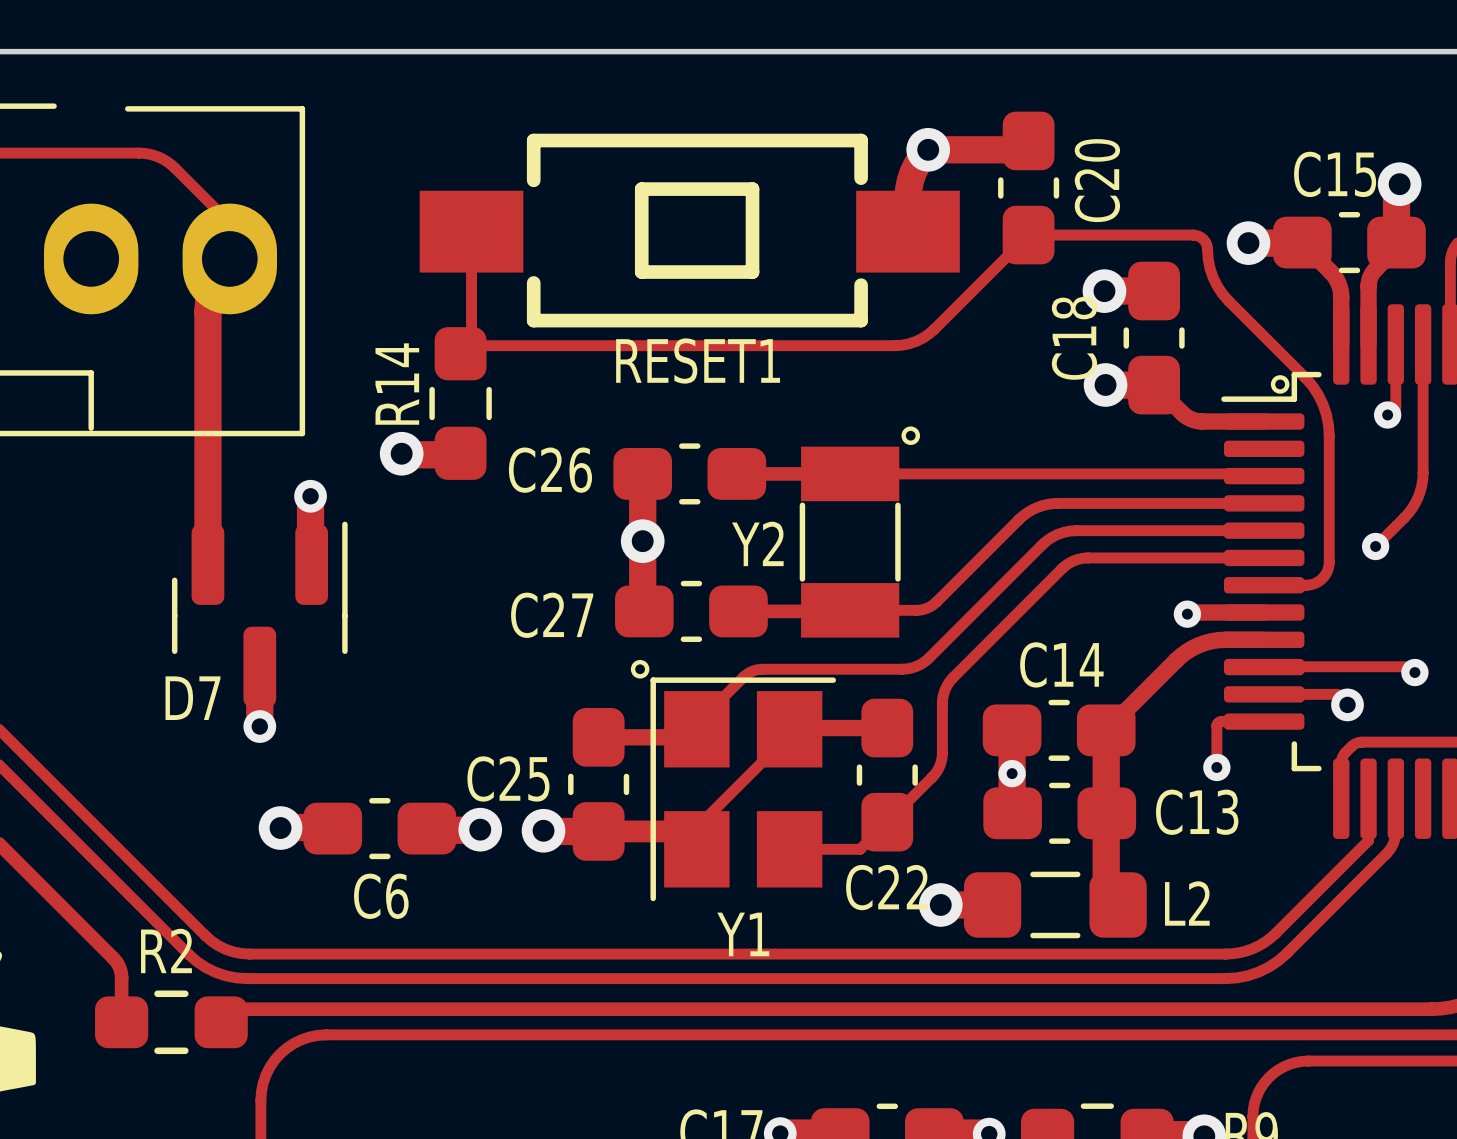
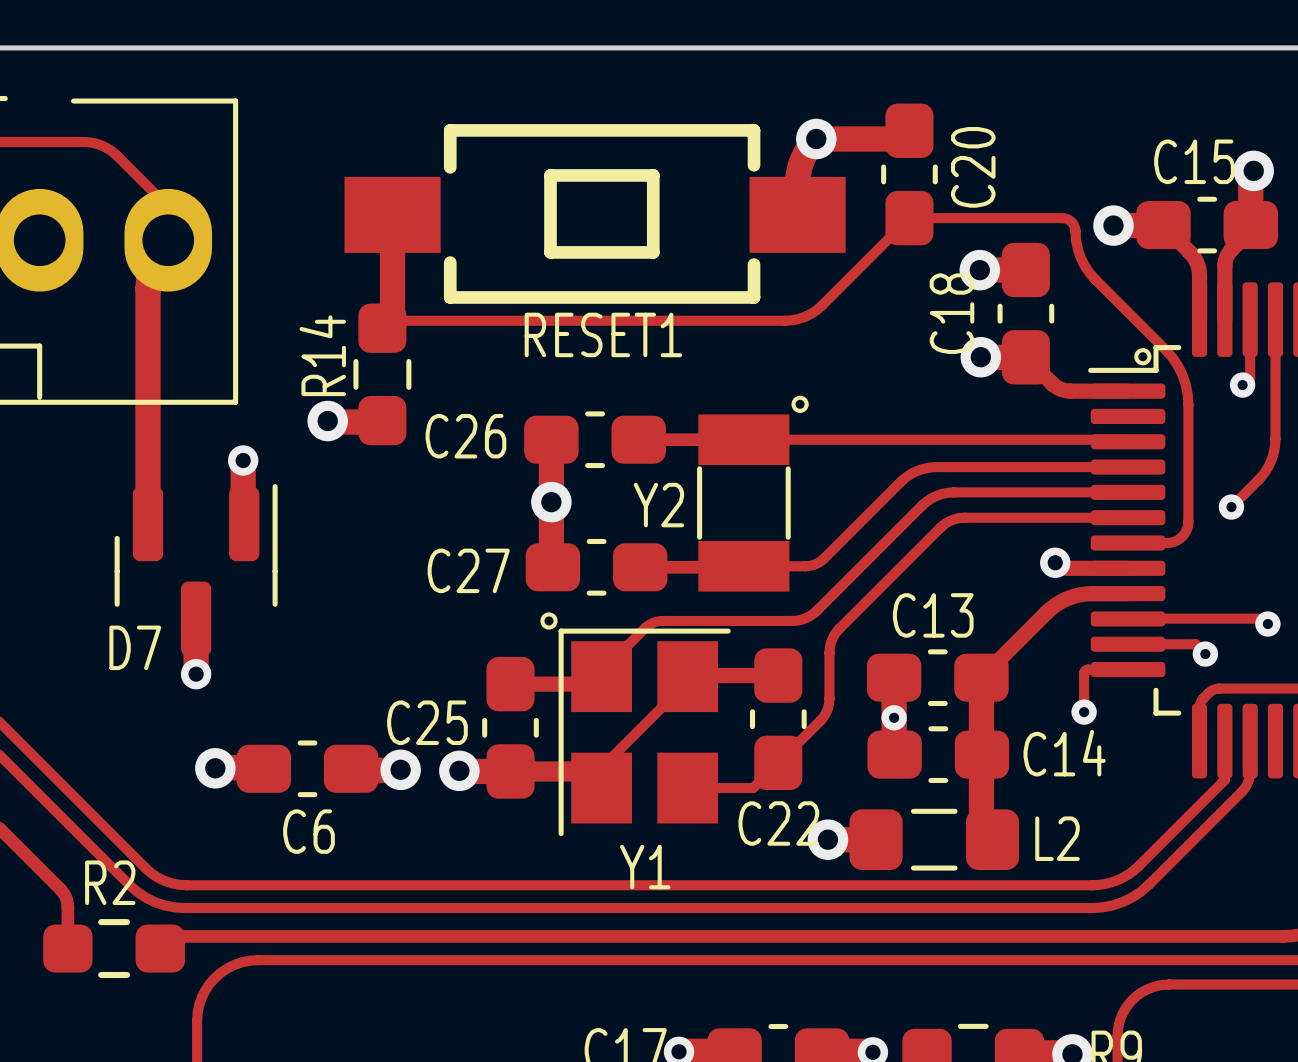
track width: thin (471, 231) (471, 342) -> thick (392, 214) (392, 318)
via position: (1187, 614) -> (1205, 654)
C14 name: C14 (1061, 664) -> C13 (933, 615)
via position: (1347, 704) -> (1055, 562)
C13 name: C13 (1197, 812) -> C14 (1064, 753)

